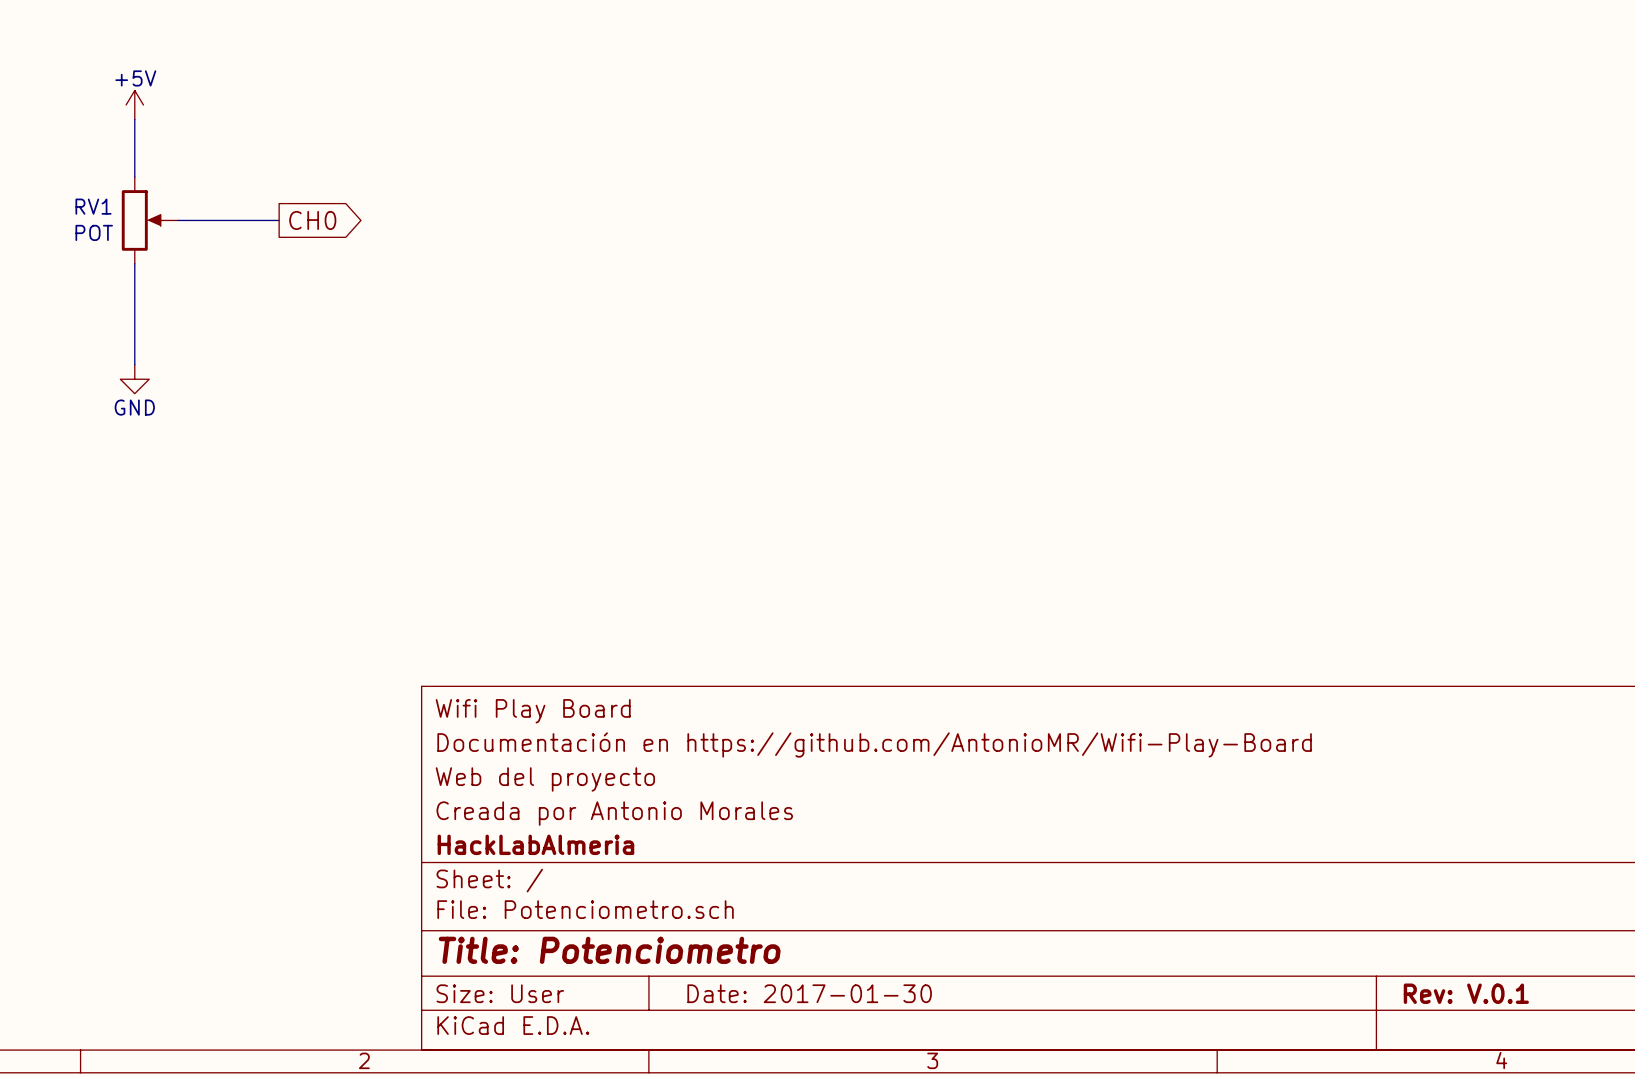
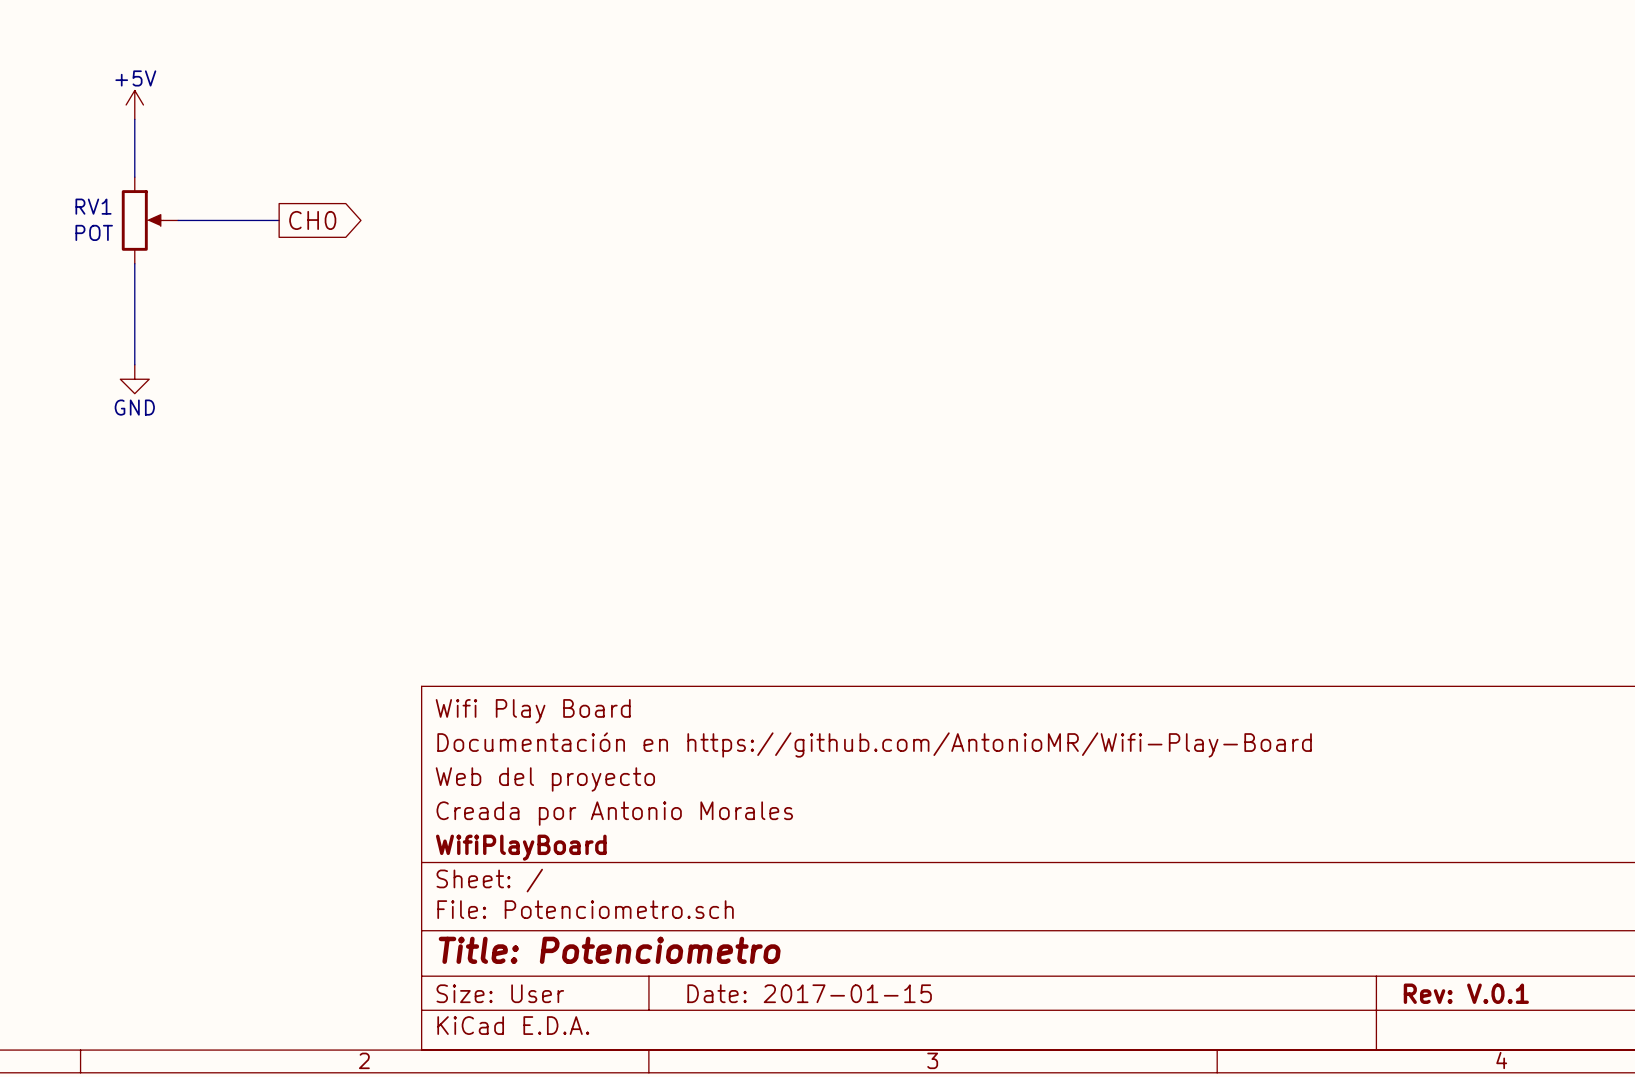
title block: HackLabAlmeria (535, 844) -> WifiPlayBoard (521, 847)
title block: Date: 2017-01-30 (809, 993) -> Date: 2017-01-15 (809, 993)

